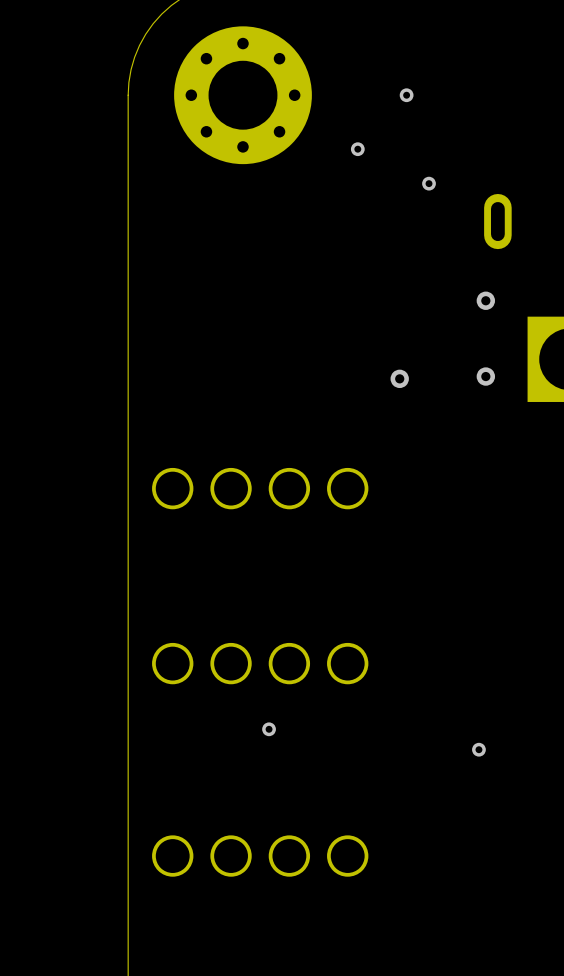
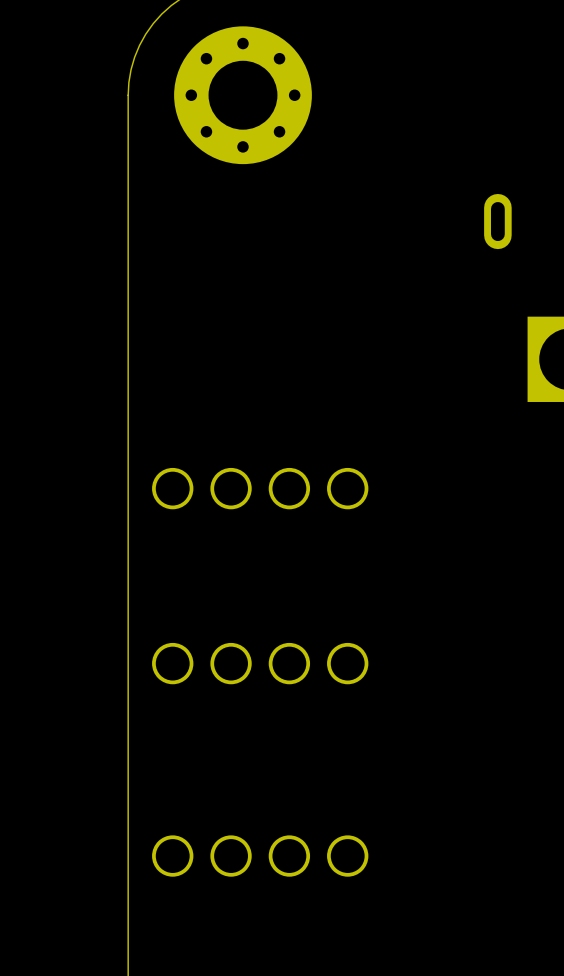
via: (406, 95) -> none
via: (357, 149) -> none
via: (429, 183) -> none
via: (485, 300) -> none
via: (485, 376) -> none
via: (399, 378) -> none
via: (269, 729) -> none
via: (478, 749) -> none

